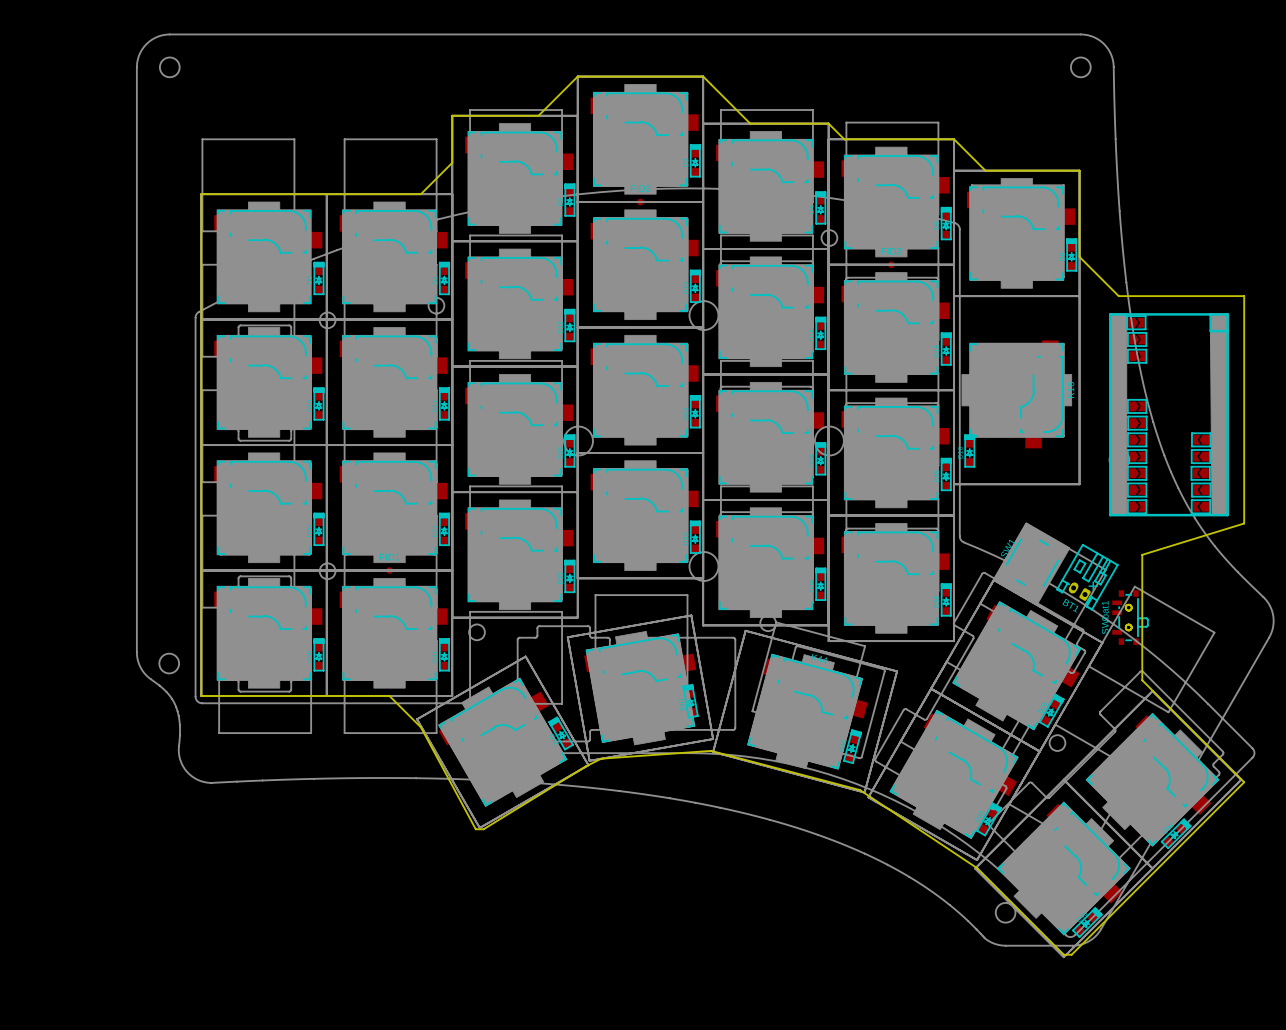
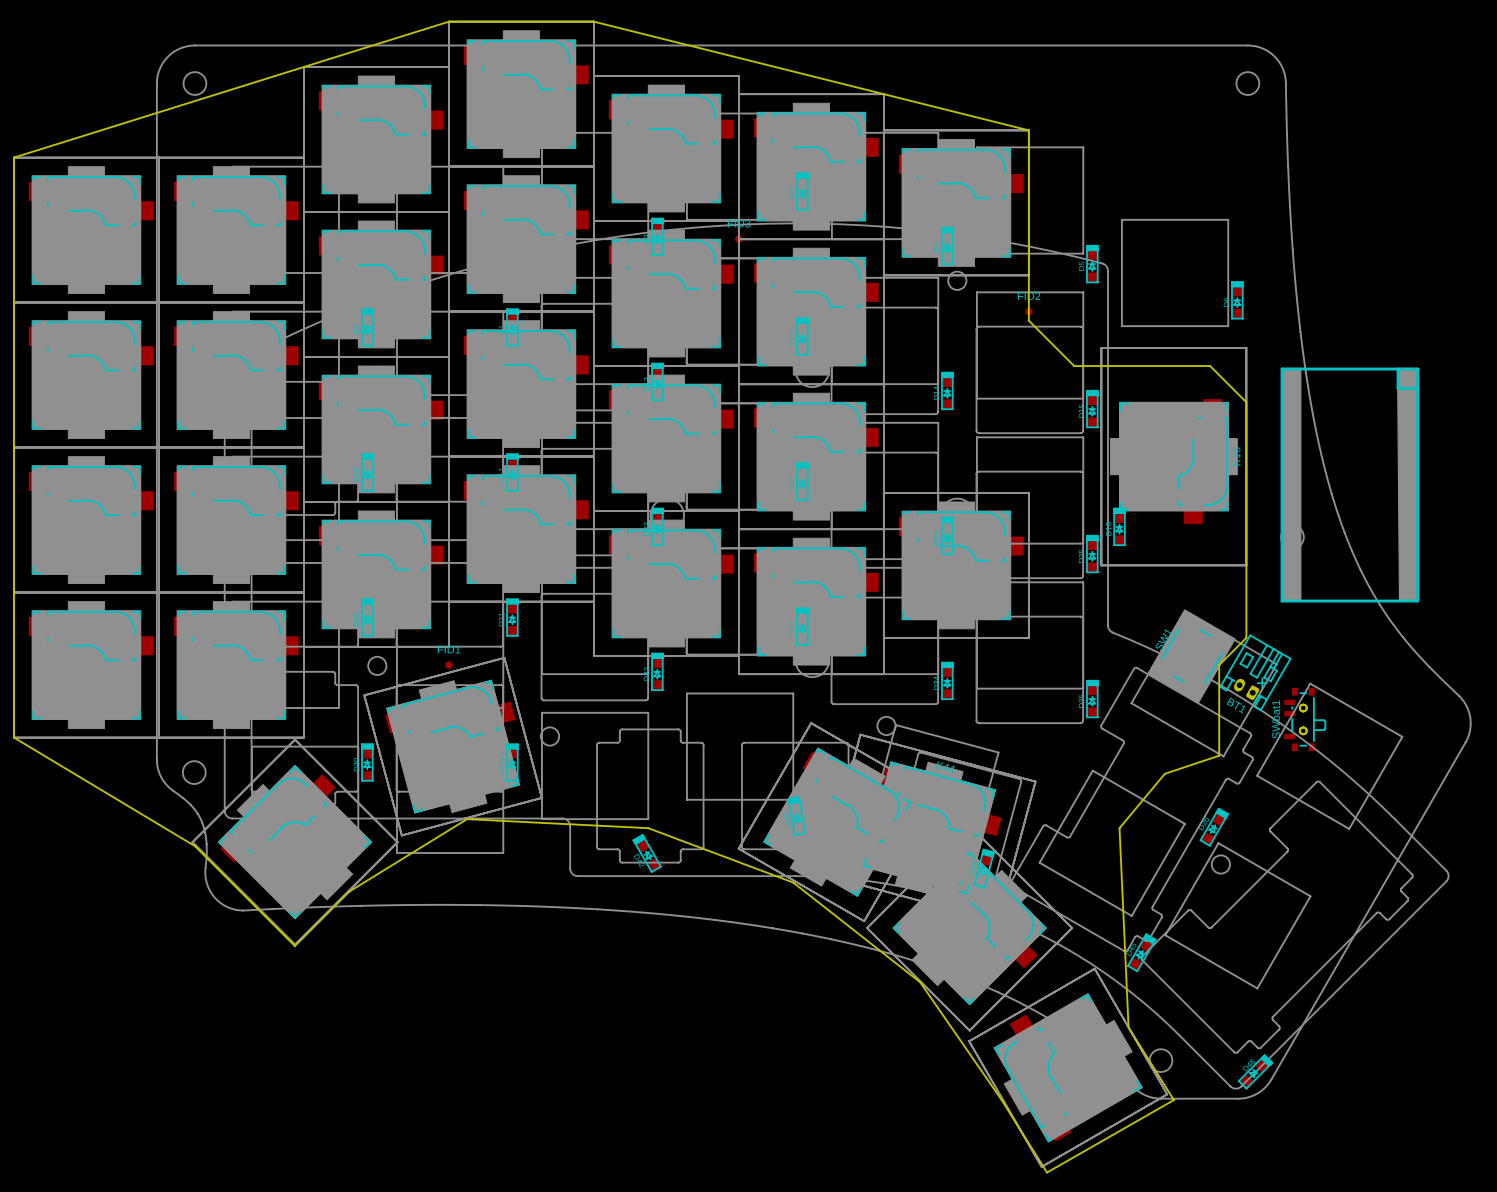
part: none -> (521, 94)
board edge: (577, 76) (538, 115) (452, 115) (452, 162) (420, 194) (201, 194) (201, 695) (389, 695) (420, 727) (475, 829) (483, 829) (601, 758) (711, 750) (859, 790) (977, 868) (1063, 954) (1071, 954) (1244, 782) (1142, 680) (1142, 554) (1244, 523) (1244, 296) (1118, 296) (1079, 256) (1079, 170) (985, 170) (954, 139) (844, 139) (828, 123) (750, 123) (703, 76) (577, 76) -> (448, 21) (13, 157) (13, 737) (195, 846) (294, 946) (349, 891) (467, 819) (648, 828) (793, 882) (920, 982) (1001, 1100) (1047, 1172) (1173, 1100) (1128, 1027) (1119, 828) (1164, 773) (1219, 755) (1219, 665) (1246, 637) (1246, 402) (1210, 366) (1074, 366) (1028, 320) (1028, 130) (593, 21) (448, 21)
part: none -> (376, 139)
part: none -> (666, 148)
part: (640, 139) -> none
part: none -> (811, 166)
part: none -> (956, 202)
part: (515, 178) -> none
part: (765, 186) -> none
part: none -> (86, 230)
part: none -> (231, 230)
part: none -> (521, 239)
part: (891, 202) -> none
part: (1016, 233) -> none
part: none -> (376, 284)
part: none -> (666, 293)
part: (264, 256) -> none
part: (389, 256) -> none
part: (640, 264) -> none
part: none -> (811, 311)
part: (515, 303) -> none
part: (765, 311) -> none
part: none -> (86, 375)
part: none -> (231, 375)
part: (1136, 322) -> none
part: none -> (521, 384)
part: (891, 327) -> none
part: (1137, 339) -> none
part: (1137, 356) -> none
part: none -> (376, 429)
part: none -> (666, 438)
part: (264, 382) -> none
part: (389, 382) -> none
part: (640, 390) -> none
part: none -> (811, 456)
part: (1137, 406) -> none
part: (1137, 423) -> none
part: (515, 429) -> none
part: (765, 437) -> none
part: (1137, 439) -> none
part: (1201, 439) -> none
part: none -> (86, 520)
part: none -> (231, 520)
part: none -> (521, 529)
part: (891, 452) -> none
part: (1137, 456) -> none
part: (1200, 456) -> none
part: (1137, 473) -> none
part: (1200, 473) -> none
part: none -> (956, 565)
part: (1137, 490) -> none
part: (1201, 490) -> none
part: none -> (376, 574)
part: none -> (666, 583)
part: (1137, 506) -> none
part: (1200, 506) -> none
part: (264, 507) -> none
part: (389, 507) -> none
part: (640, 515) -> none
part: none -> (811, 601)
part: (515, 554) -> none
part: (765, 562) -> none
part: none -> (86, 665)
part: none -> (231, 665)
part: (891, 578) -> none
part: (264, 633) -> none
part: (389, 633) -> none
part: none -> (453, 746)
part: (1016, 665) -> none
part: (640, 688) -> none
part: none -> (837, 822)
part: none -> (295, 842)
part: (502, 742) -> none
part: (954, 774) -> none
part: (1152, 779) -> none
part: none -> (969, 928)
part: (1176, 833) -> none
part: (1063, 868) -> none
part: none -> (1068, 1067)

